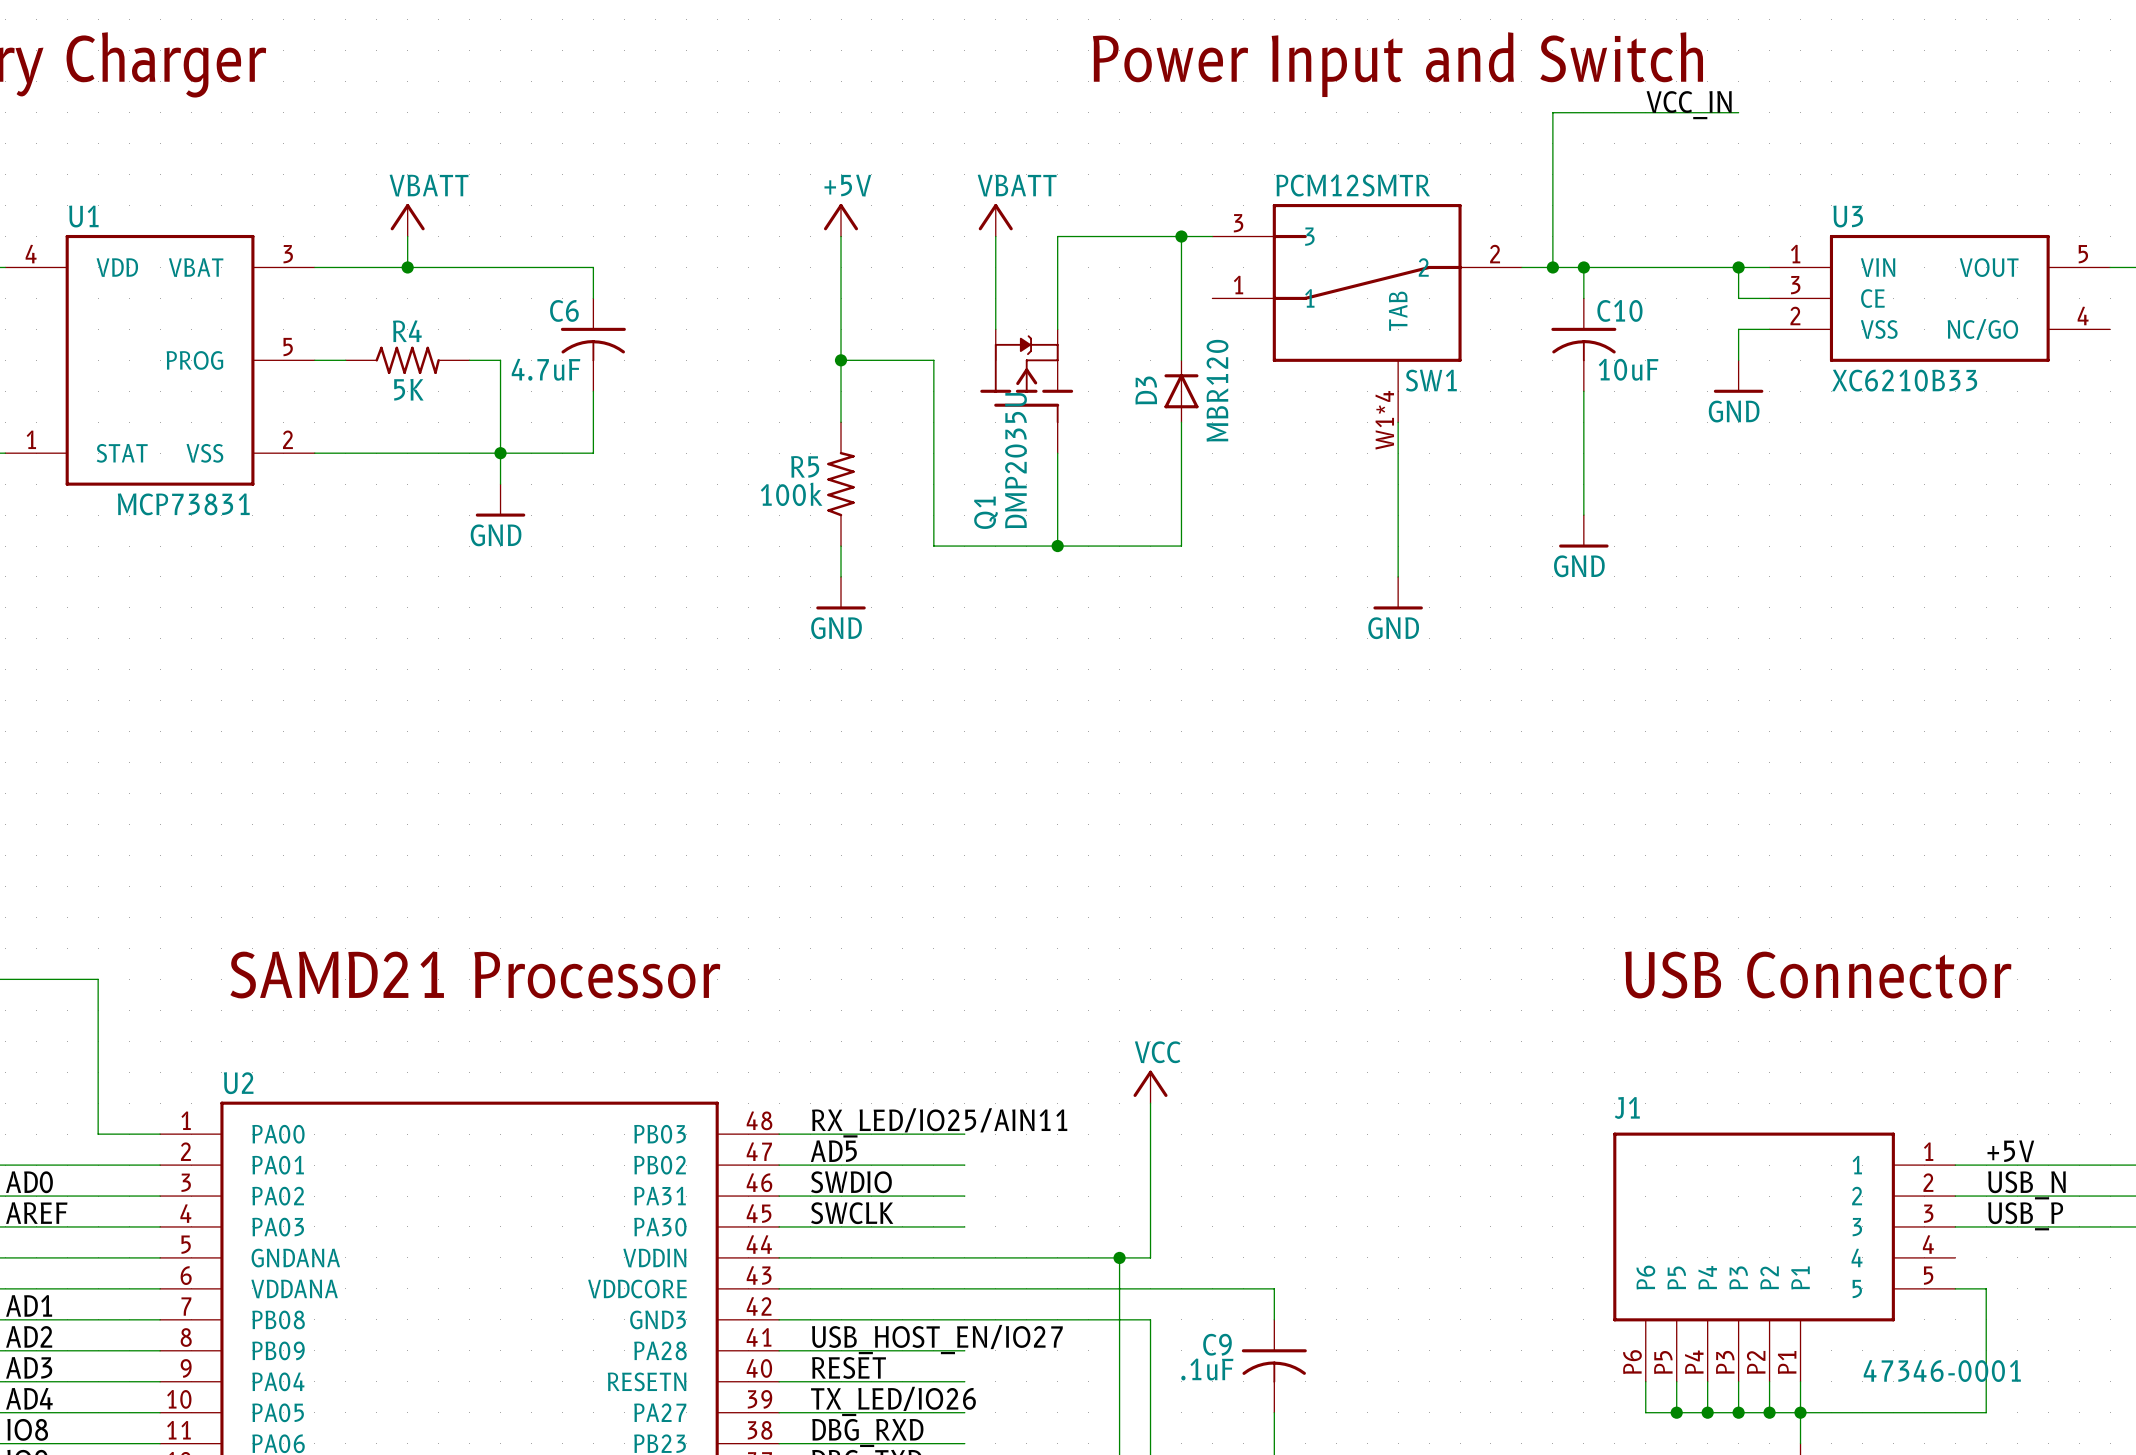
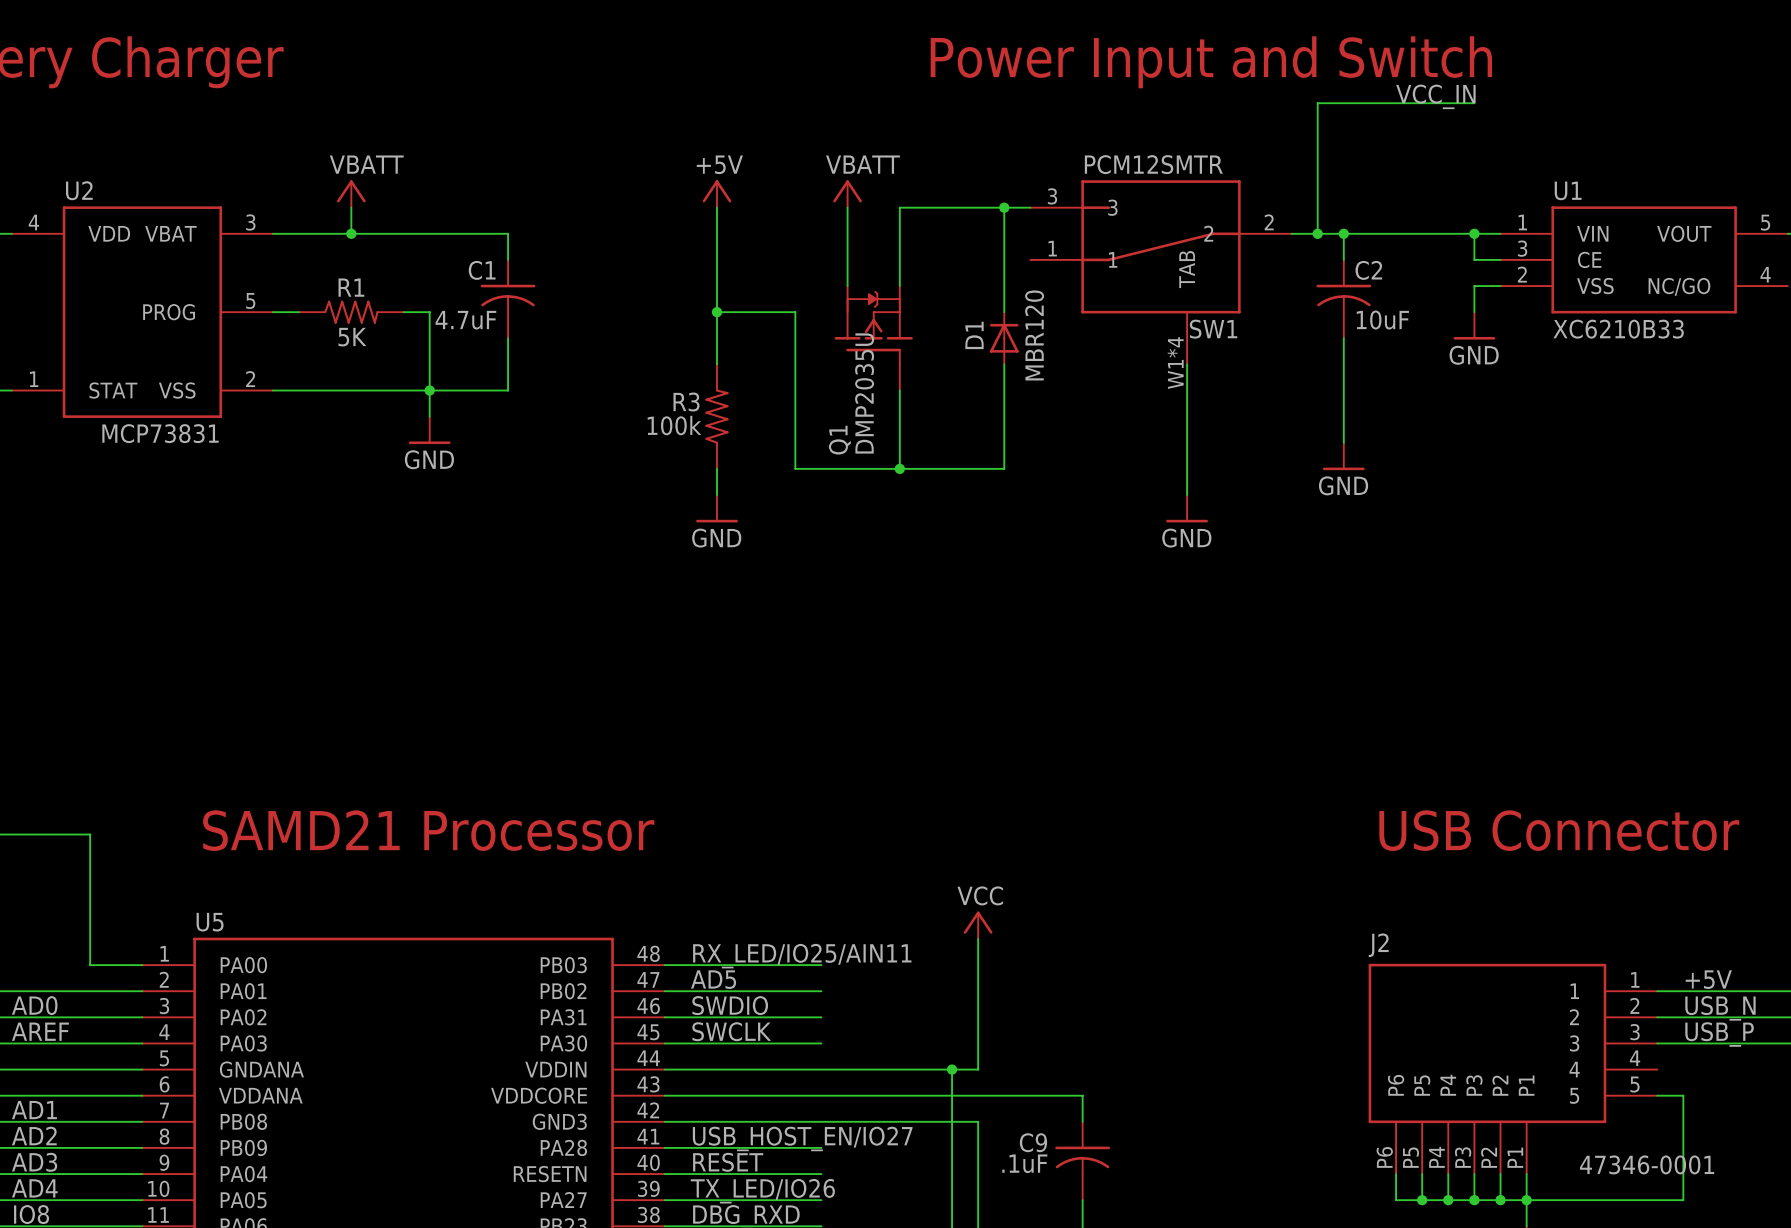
U1 name: U1 (83, 216) -> U2 (79, 190)
U3 name: U3 (1848, 216) -> U1 (1568, 190)
C6 name: C6 (564, 310) -> C1 (482, 270)
C10 name: C10 (1619, 310) -> C2 (1368, 270)
R4 name: R4 (407, 331) -> R1 (351, 287)
D3 name: D3 (1146, 390) -> D1 (974, 335)
R5 name: R5 (805, 466) -> R3 (686, 402)
U2 name: U2 (238, 1083) -> U5 (210, 922)
J1 name: J1 (1627, 1107) -> J2 (1378, 945)

